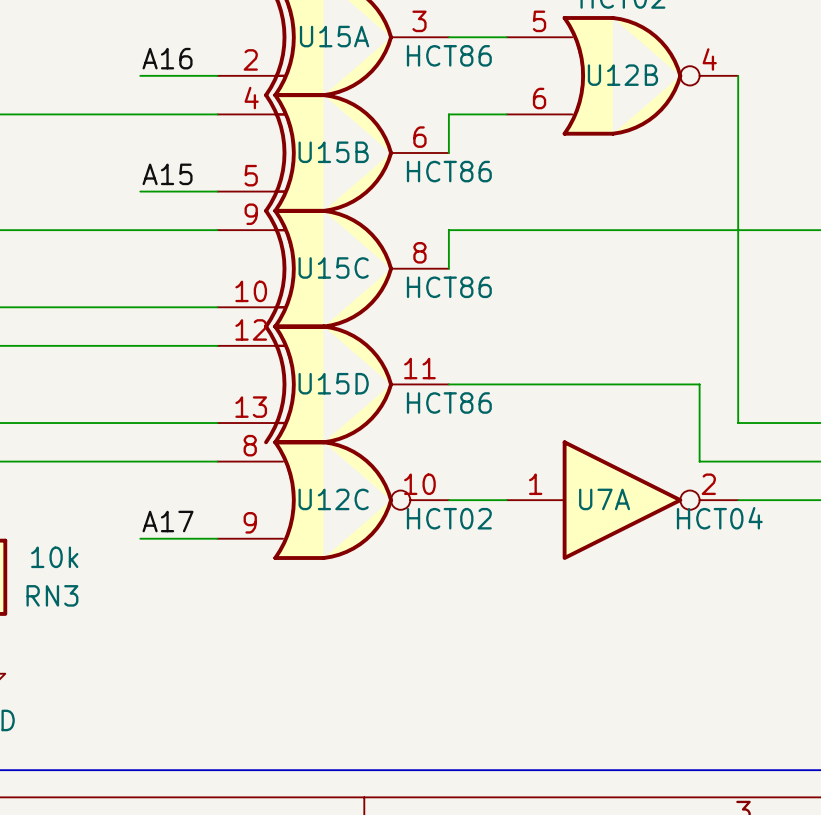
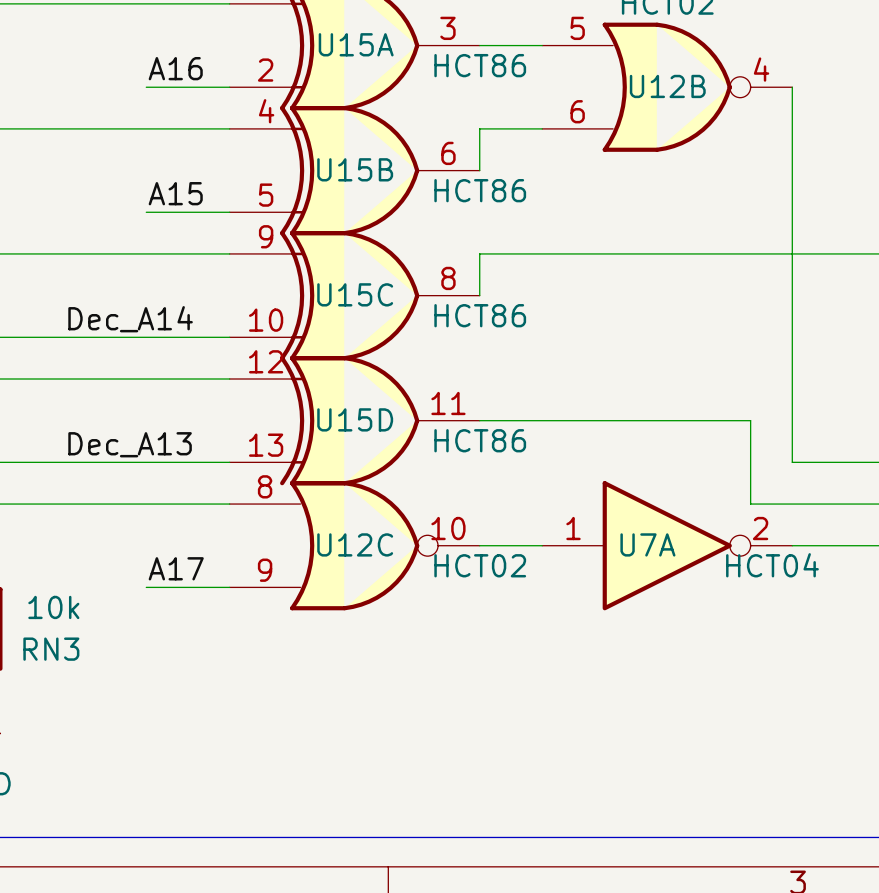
label: none -> Dec_A14 (130, 319)
label: none -> Dec_A13 (130, 444)

